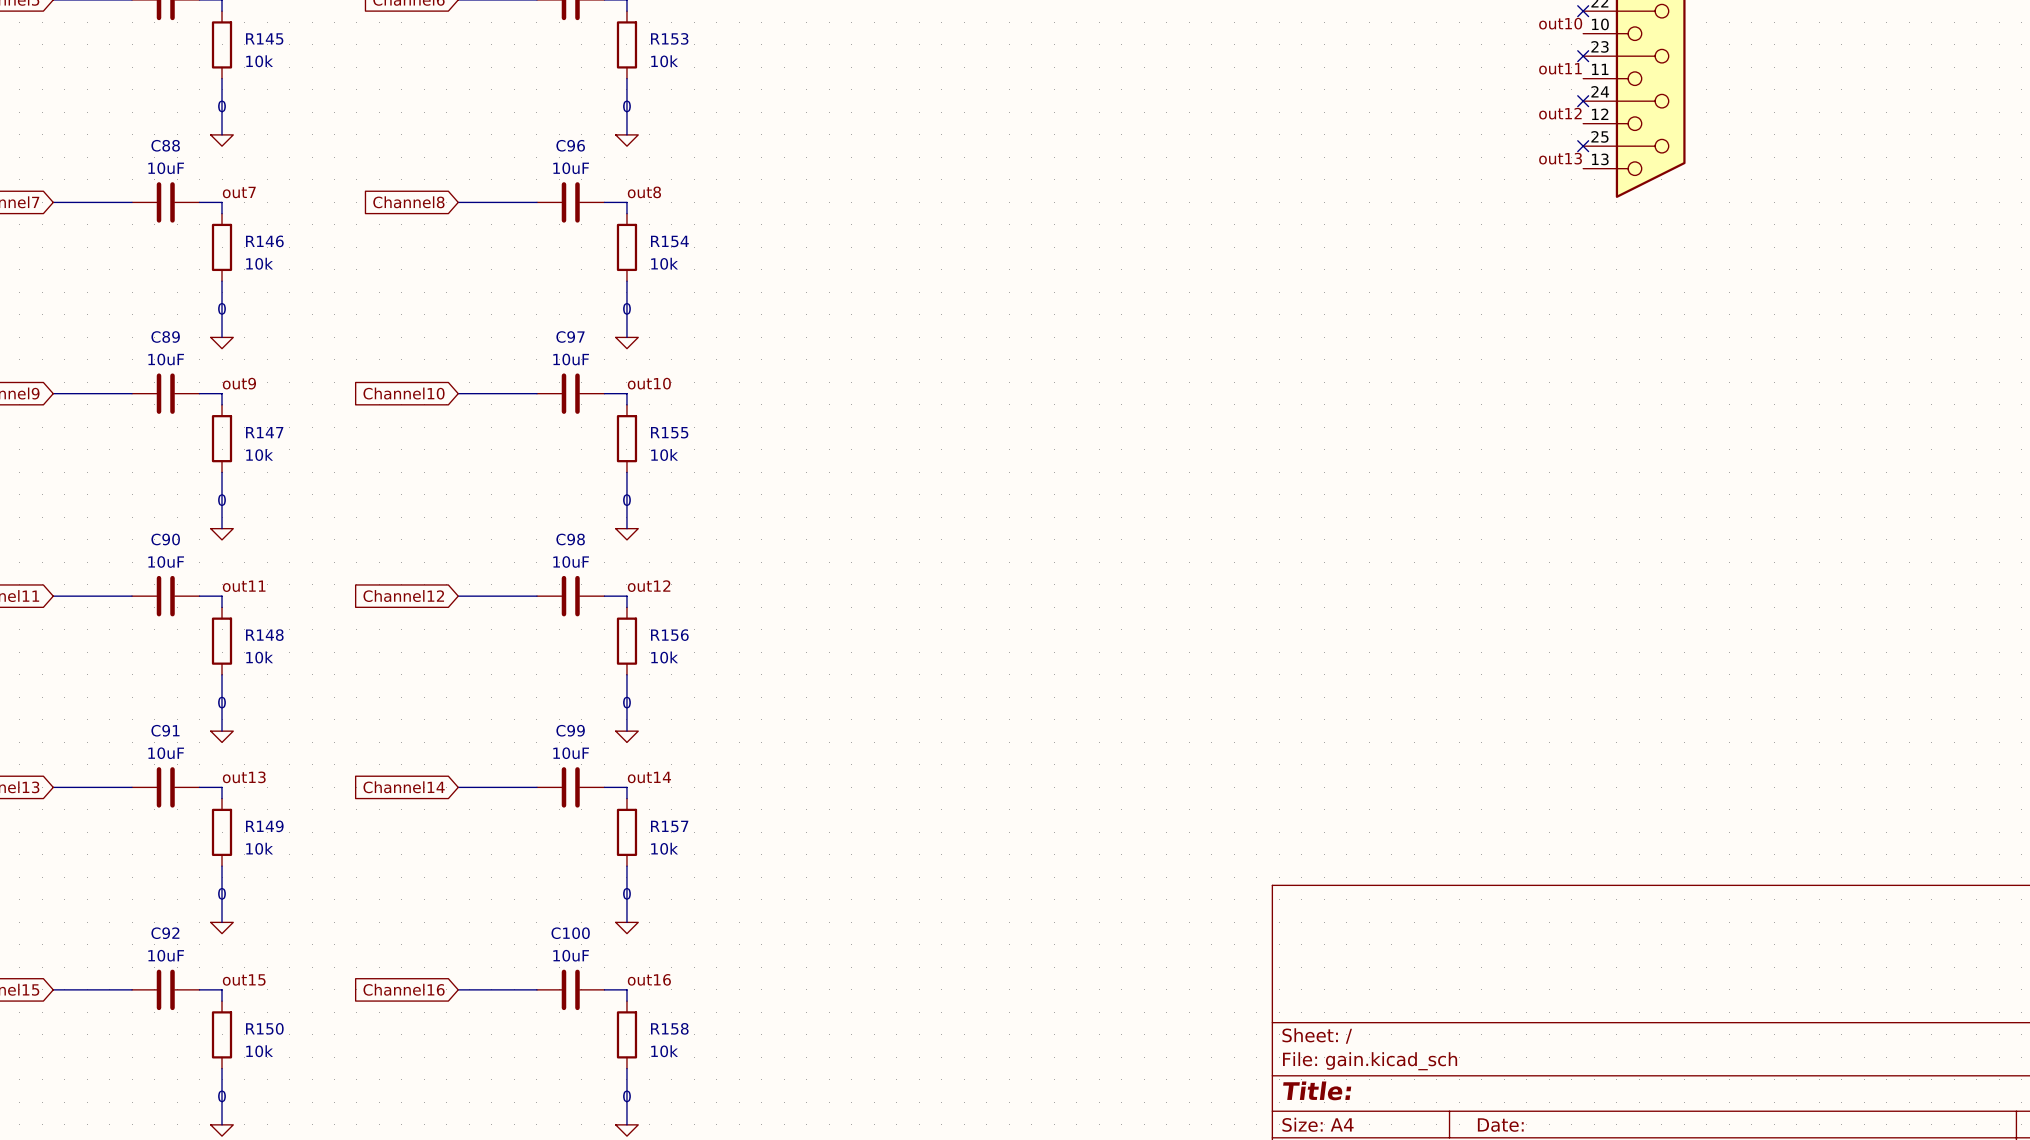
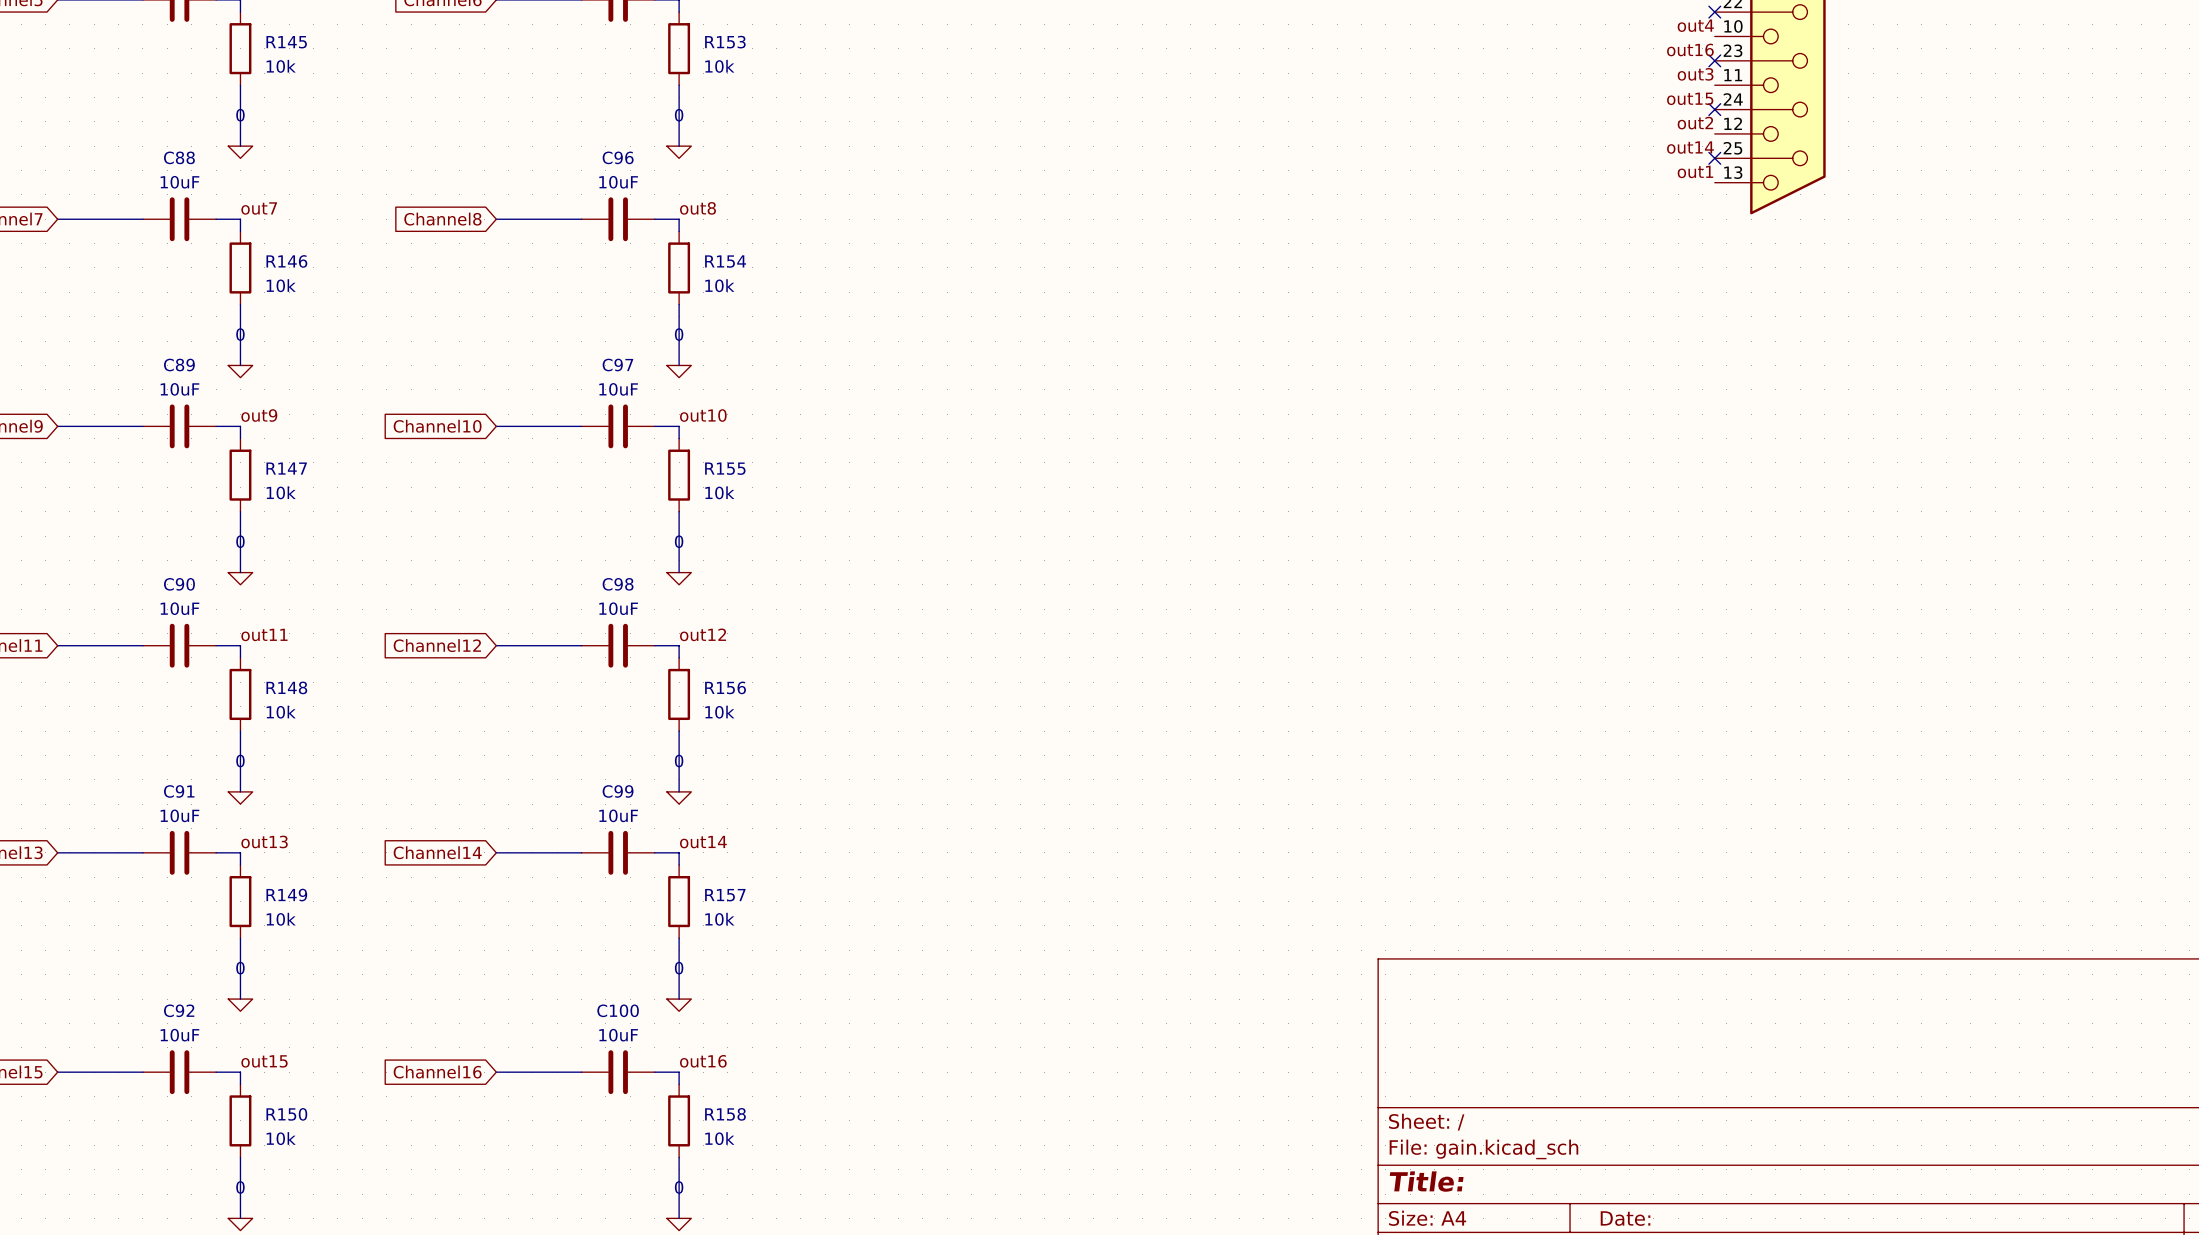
label: out10 (1560, 23) -> out4 (1695, 25)
label: none -> out16 (1690, 49)
label: out11 (1560, 68) -> out3 (1695, 74)
label: none -> out15 (1690, 98)
label: out12 (1560, 113) -> out2 (1695, 123)
label: none -> out14 (1690, 147)
label: out13 (1560, 158) -> out1 (1695, 171)

